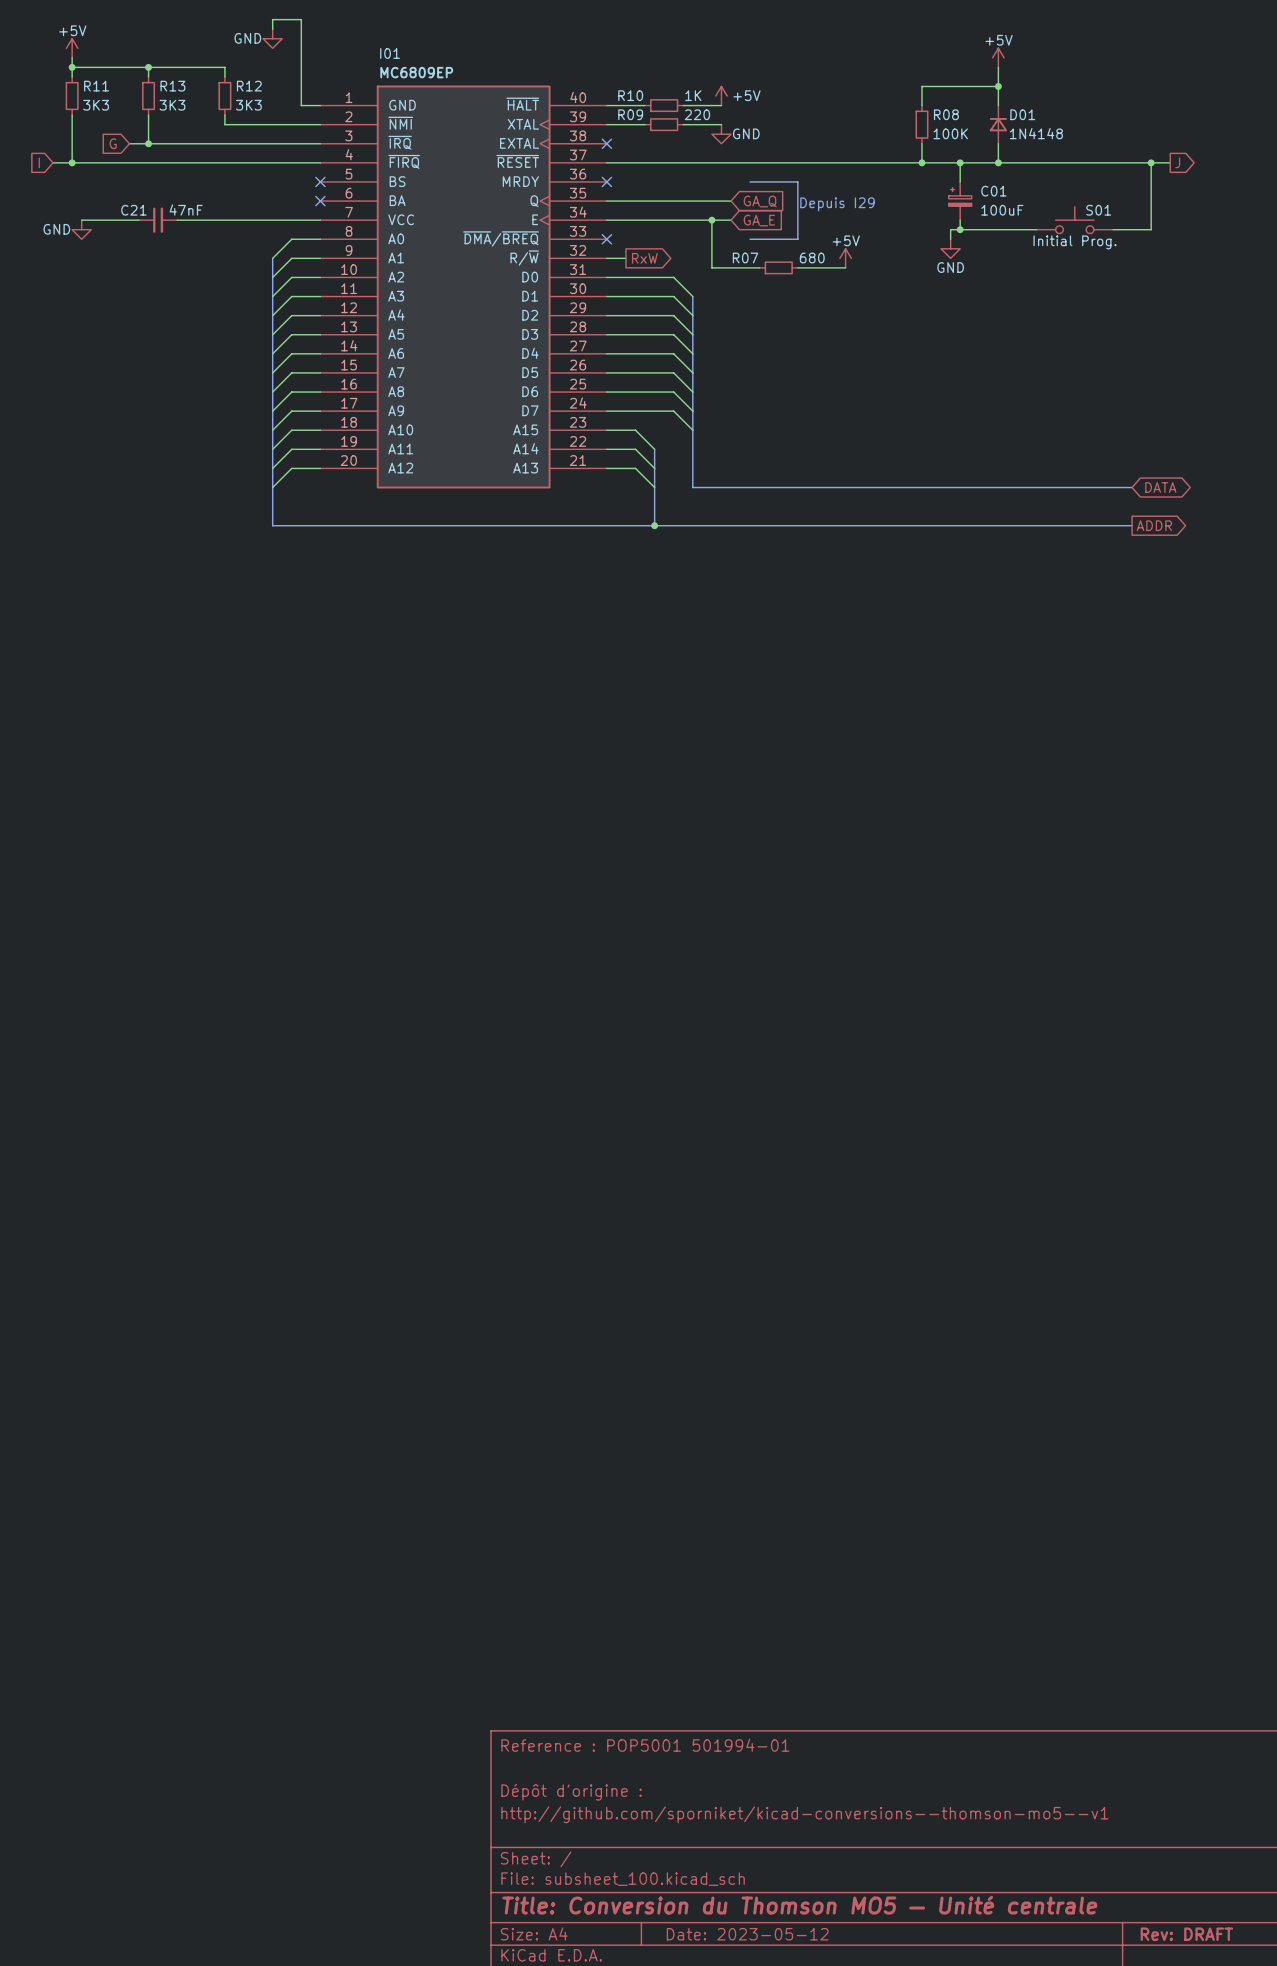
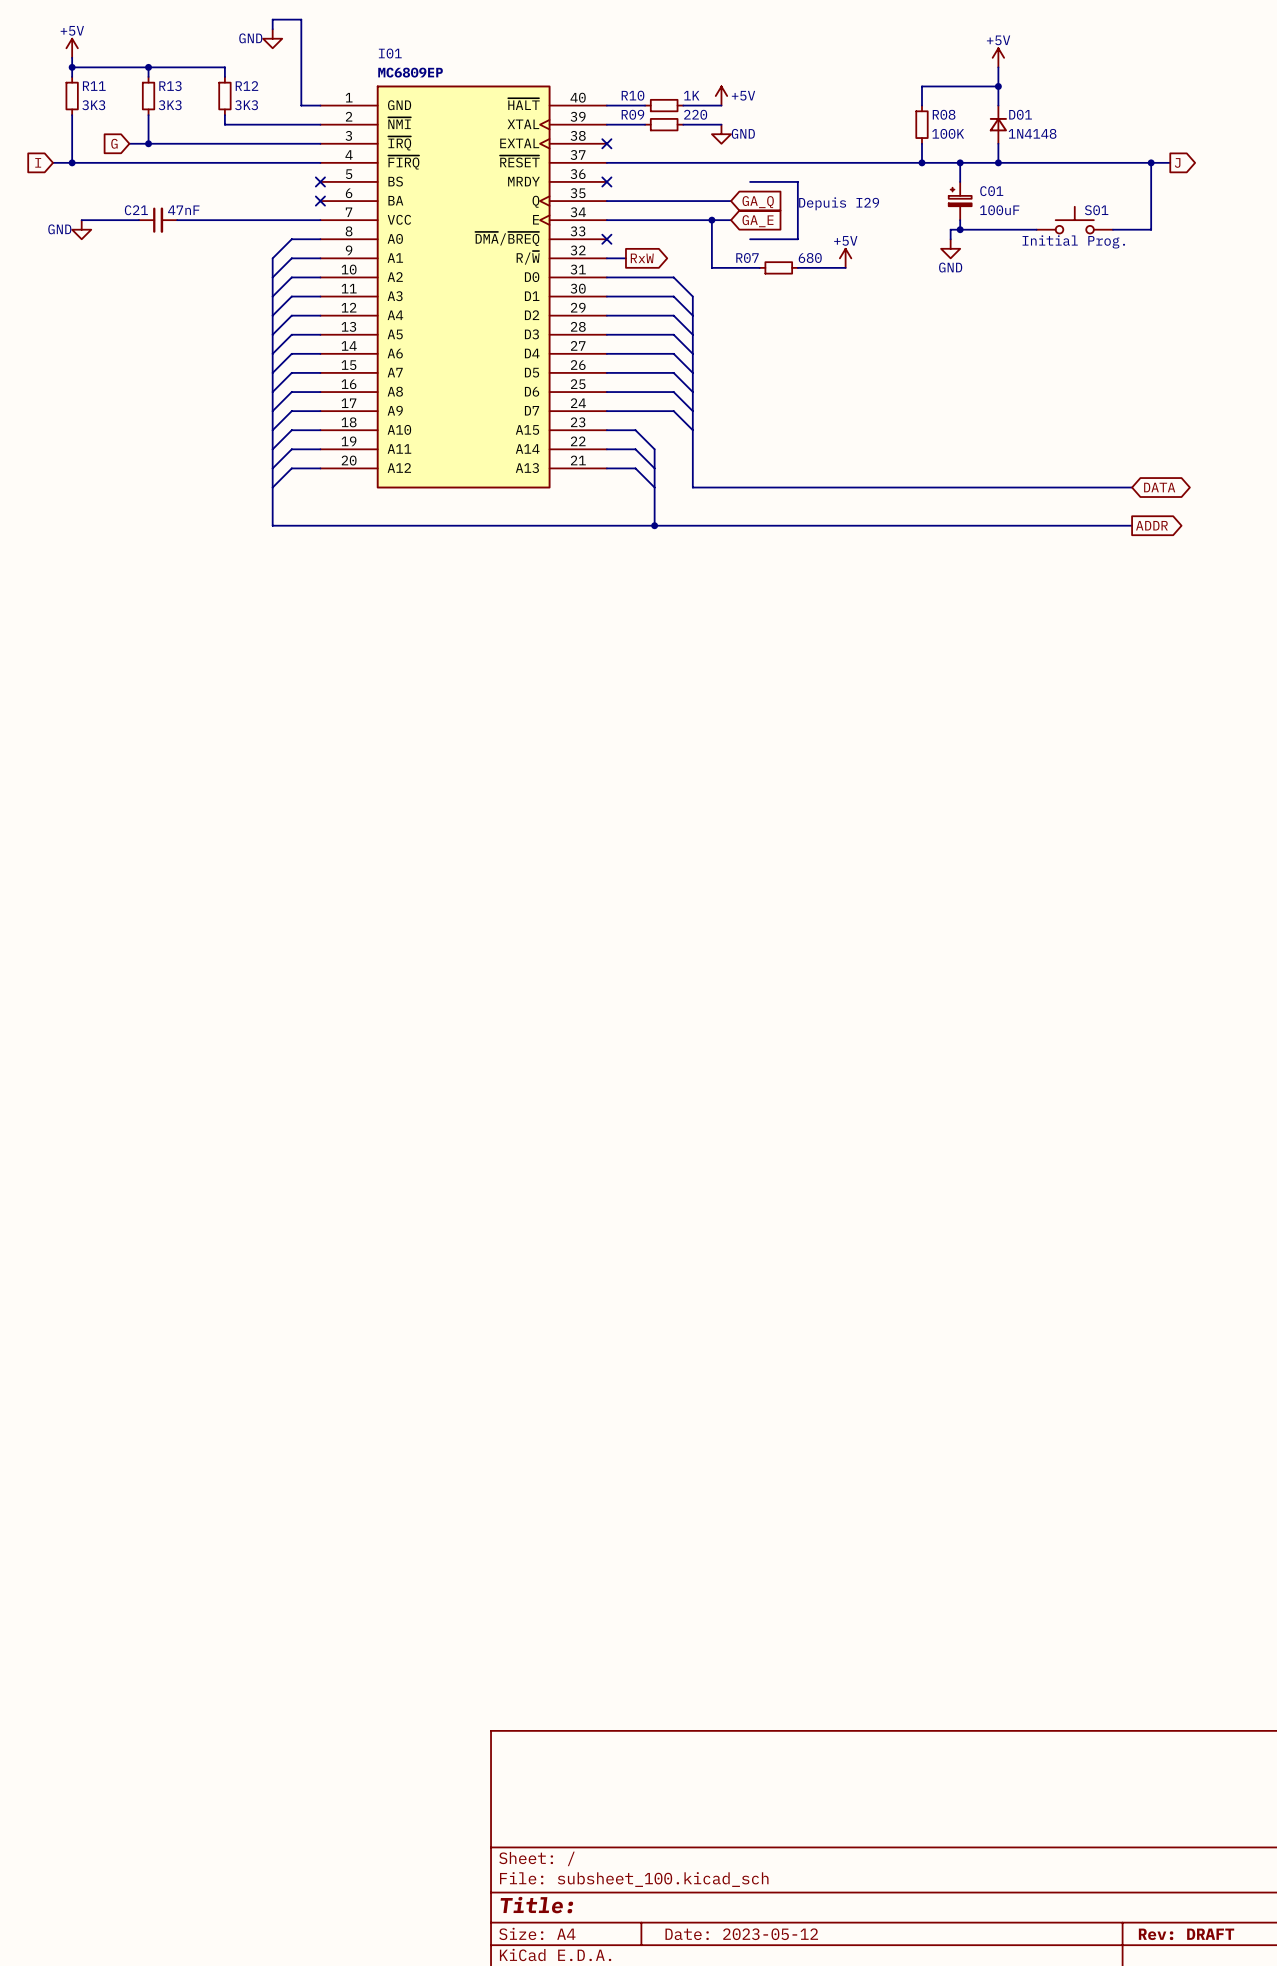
title block: Reference : POP5001 501994-01 (645, 1745) -> none
title block: Dépôt d'origine : (571, 1792) -> none
title block: http://github.com/sporniket/kicad-conversions--thomson-mo5--v1 (804, 1814) -> none
title block: Title: Conversion du Thomson MO5 — Unité centrale (799, 1905) -> Title: (536, 1905)

